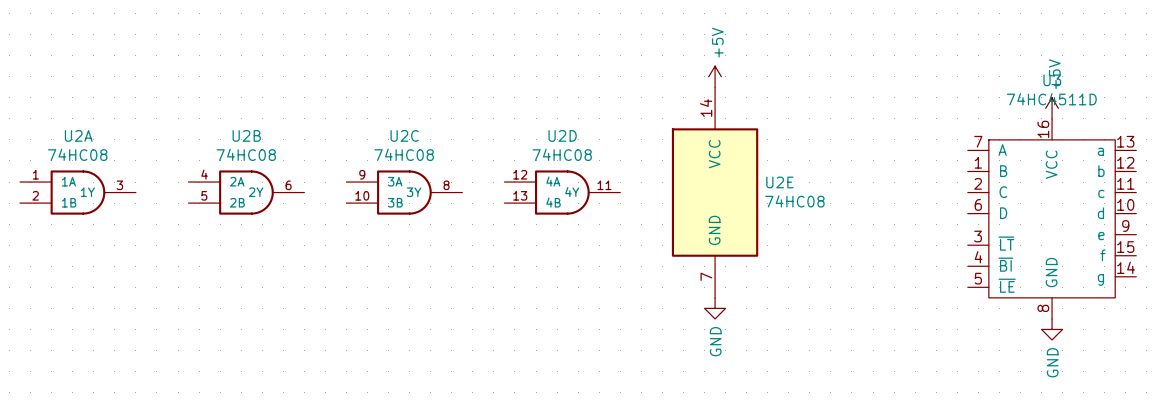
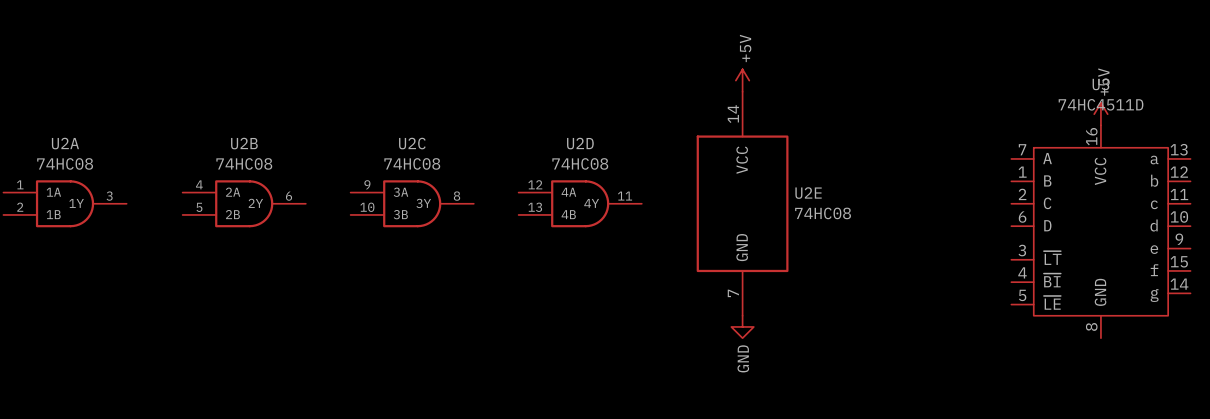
power symbol: GND (1052, 329) -> none

